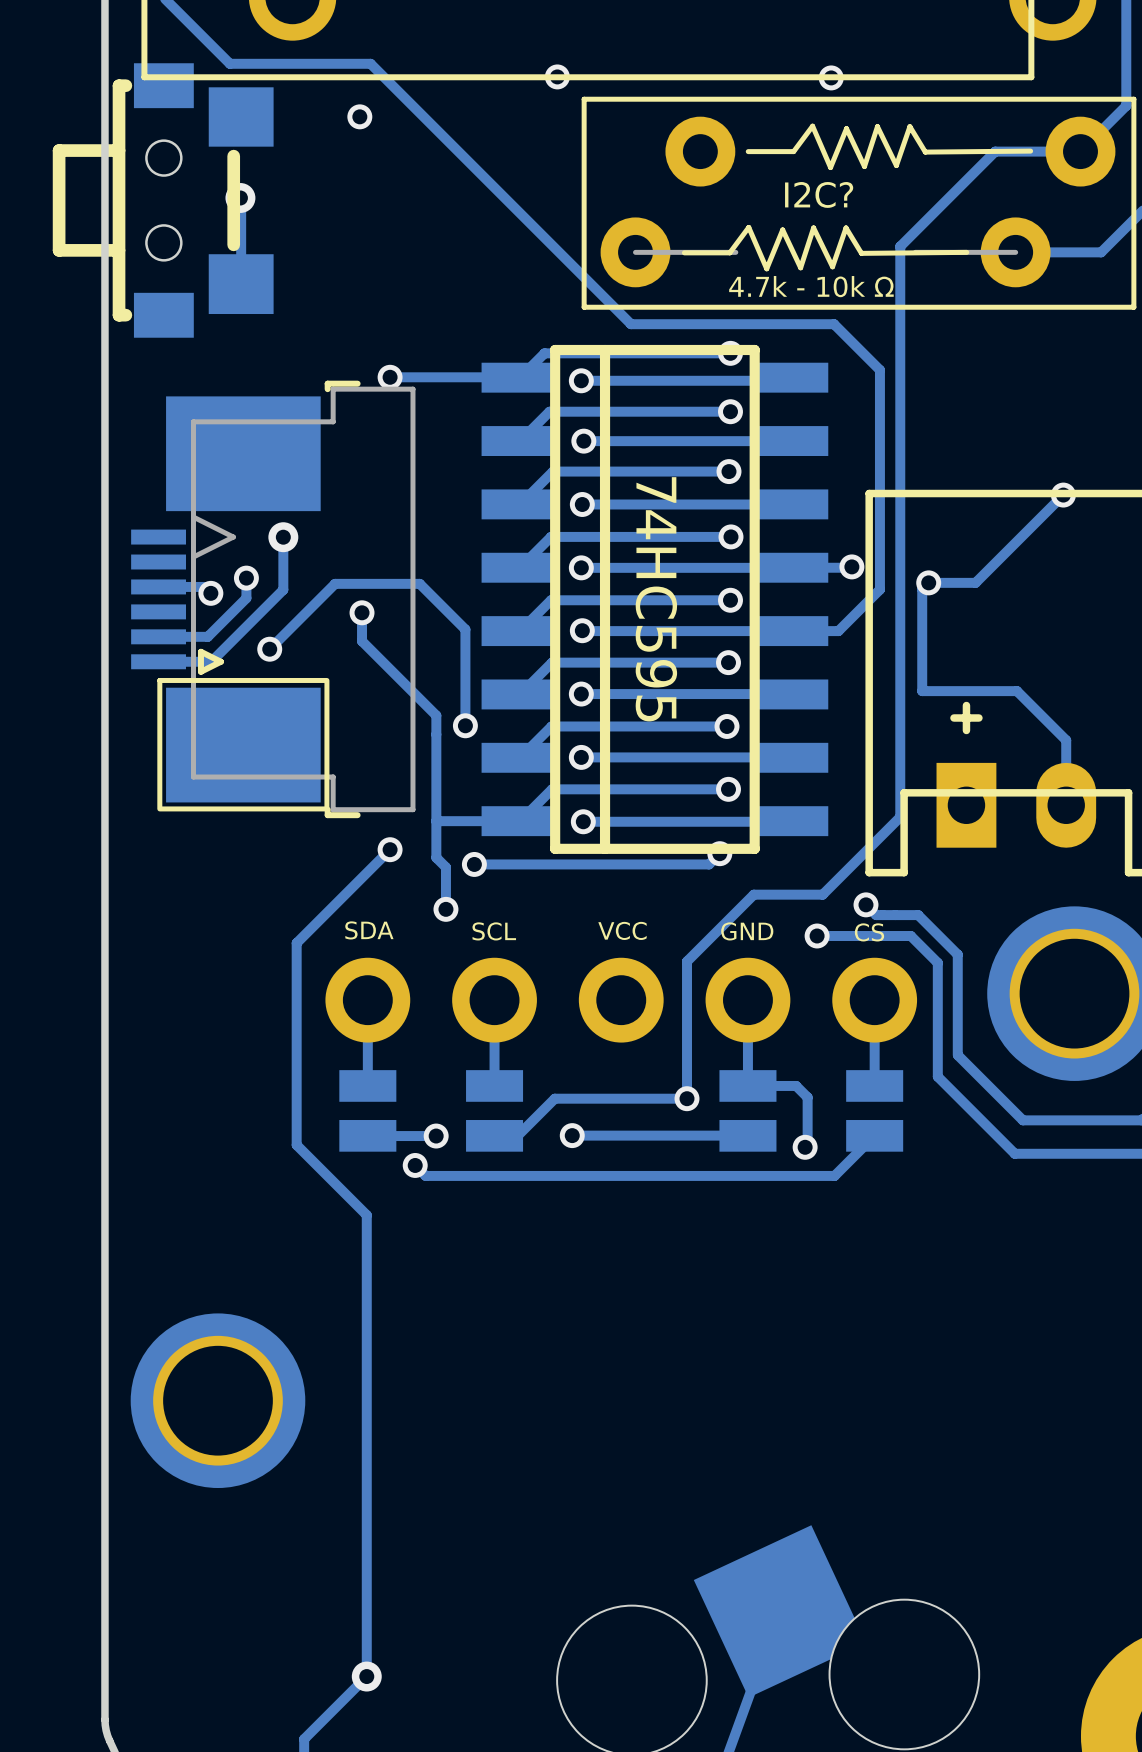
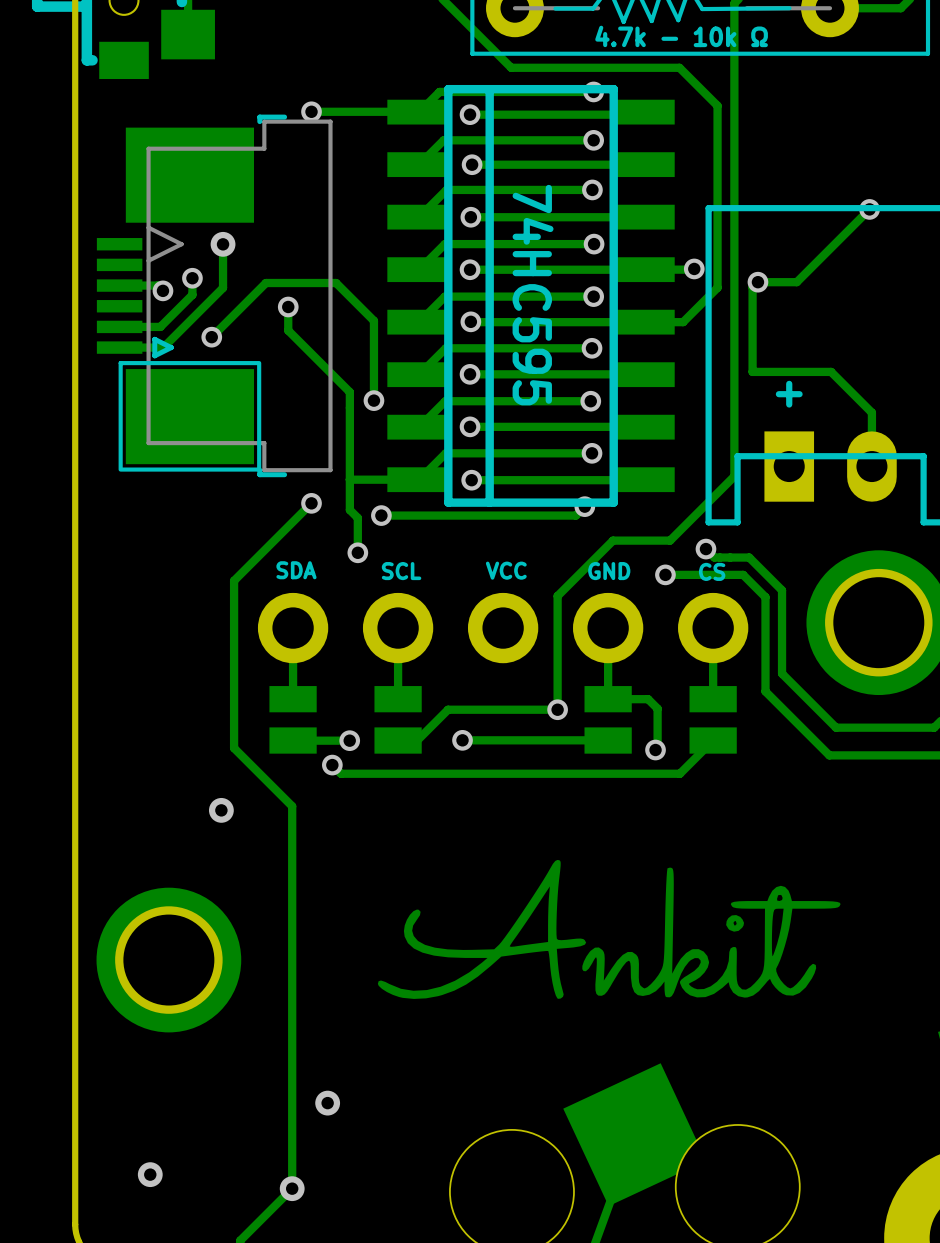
via: none -> (221, 810)
drawing: none -> [377, 859, 841, 999]
via: none -> (327, 1103)
via: none -> (150, 1174)

